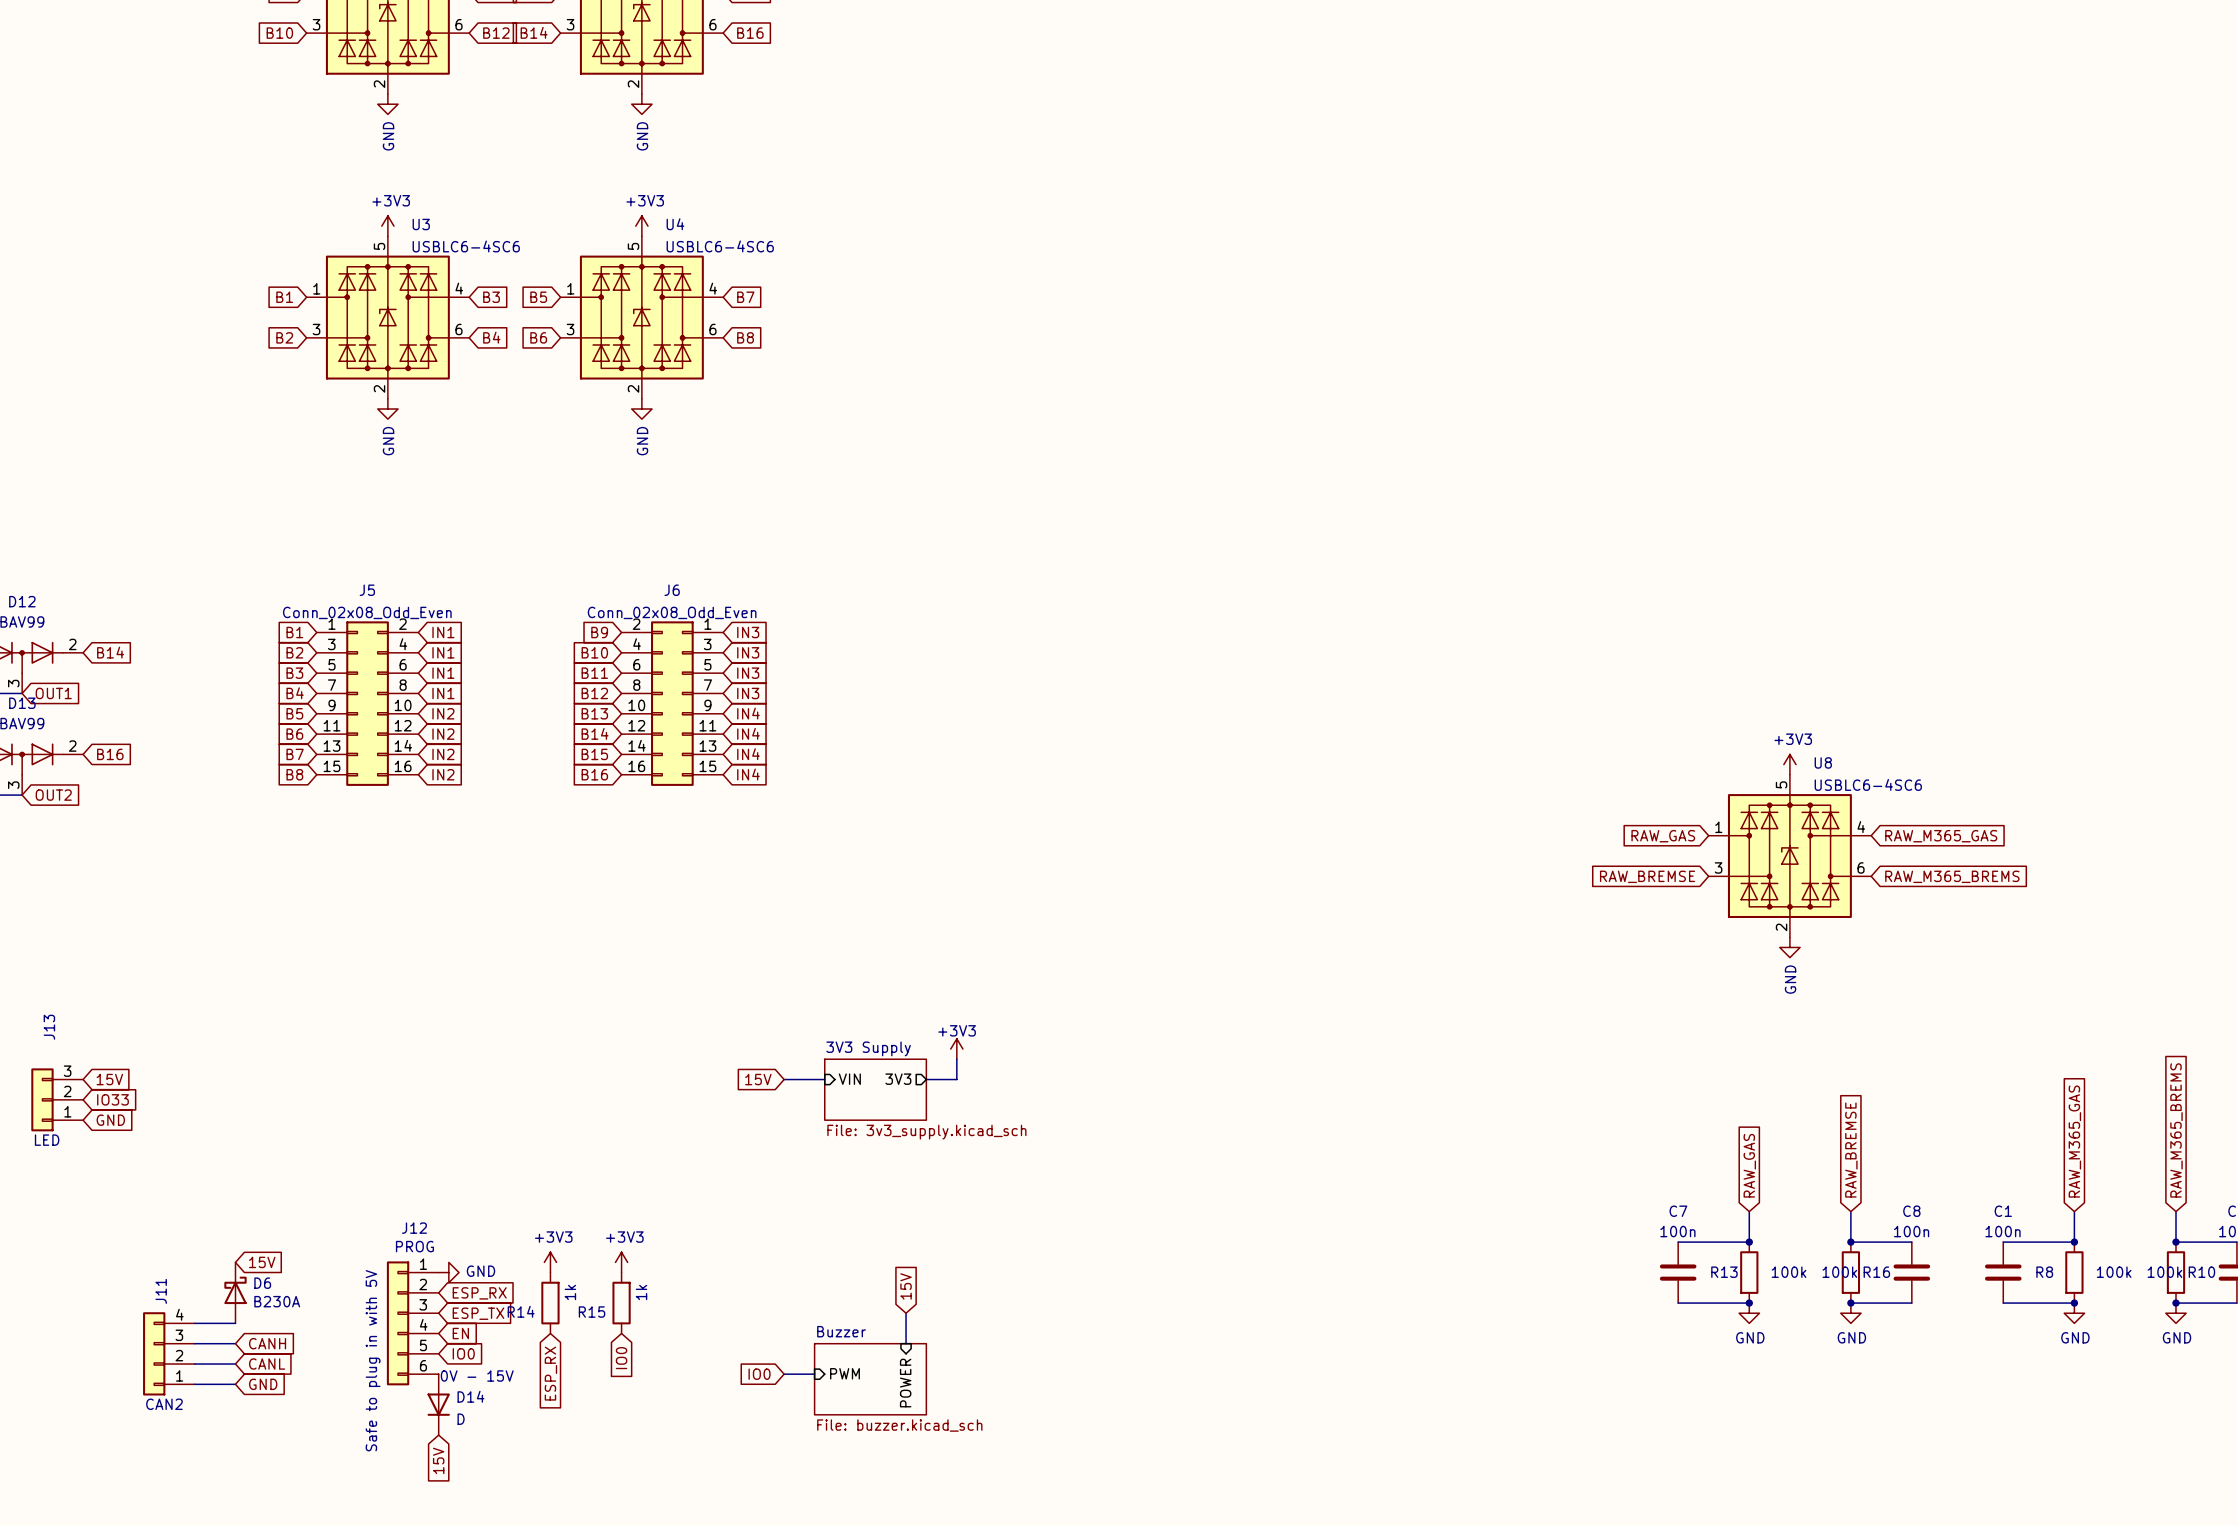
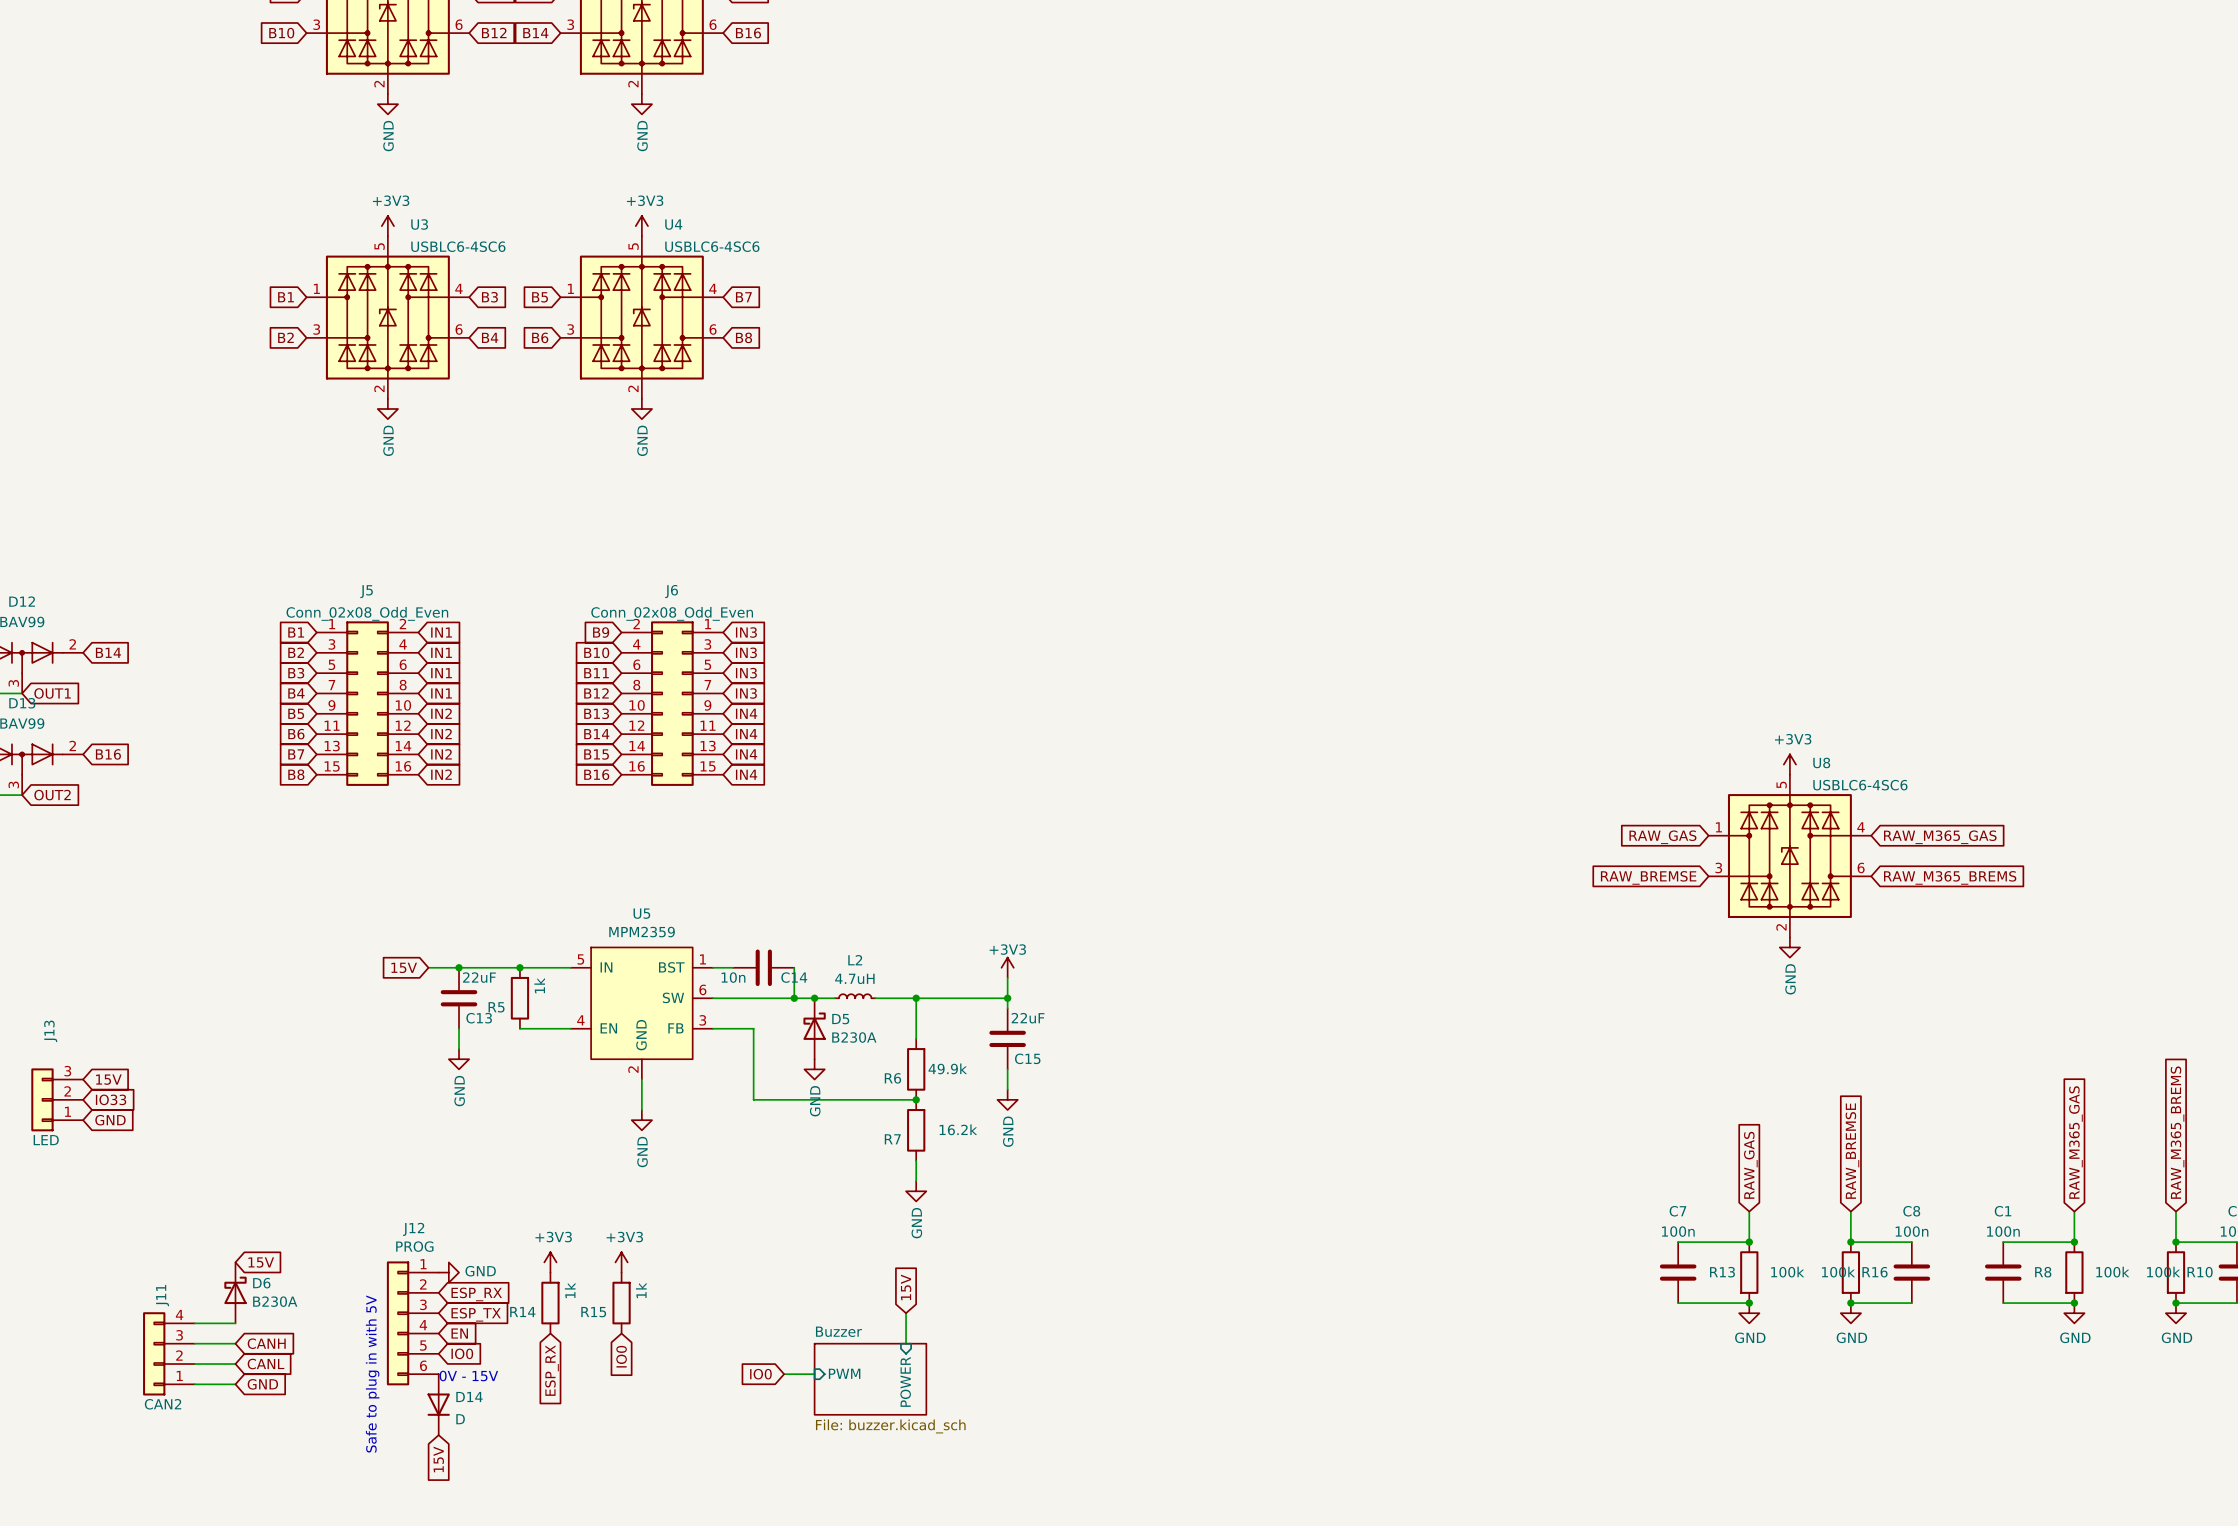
global label: none -> 15V (404, 967)
wire: none -> (428, 967) (570, 967)
junction: none -> (459, 967)
junction: none -> (519, 967)
wire: none -> (713, 967) (733, 967)
C14: none -> 10n (763, 967)
wire: none -> (794, 967) (794, 998)
wire: none -> (1007, 977) (1007, 1008)
L2: none -> 4.7uH (855, 996)
C13: none -> 22uF (459, 998)
R5: none -> 1k (519, 998)
wire: none -> (713, 998) (834, 998)
junction: none -> (794, 998)
junction: none -> (814, 998)
wire: none -> (875, 998) (1007, 998)
wire: none -> (916, 998) (916, 1038)
junction: none -> (916, 998)
junction: none -> (1007, 998)
U5: none -> MPM2359 (641, 1013)
wire: none -> (459, 1028) (459, 1049)
wire: none -> (519, 1028) (570, 1028)
wire: none -> (713, 1028) (753, 1028) (753, 1099) (916, 1099)
D5: none -> B230A (814, 1028)
C15: none -> 22uF (1007, 1038)
power symbol position: +3V3 (956, 1049) -> +3V3 (1007, 967)
power symbol: none -> GND (459, 1059)
wire: (956, 1059) (956, 1079) (926, 1079) -> none
power symbol: none -> GND (814, 1069)
R6: none -> 49.9k (916, 1069)
wire: none -> (1007, 1069) (1007, 1089)
wire: none -> (641, 1079) (641, 1110)
global label: 15V (758, 1079) -> none
wire: (784, 1079) (824, 1079) -> none
sheet pin: VIN (849, 1079) -> none
sheet pin: 3V3 (898, 1079) -> none
sheet 3V3 Supply: File: 3v3_supply.kicad_sch (875, 1089) -> none
junction: none -> (916, 1099)
power symbol: none -> GND (1007, 1099)
power symbol: none -> GND (641, 1120)
R7: none -> 16.2k (916, 1130)
wire: none -> (916, 1160) (916, 1181)
power symbol: none -> GND (916, 1191)

